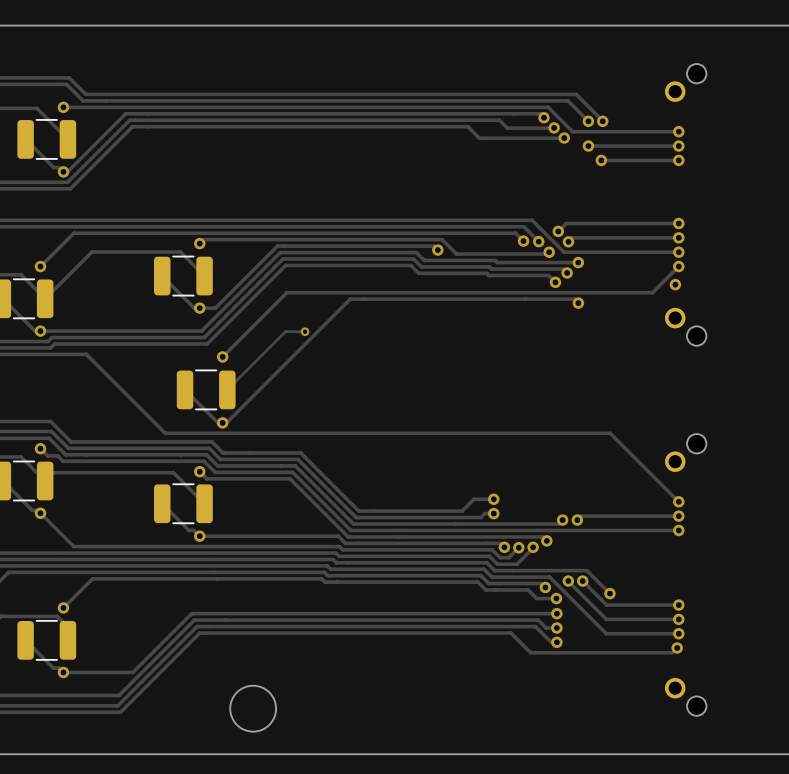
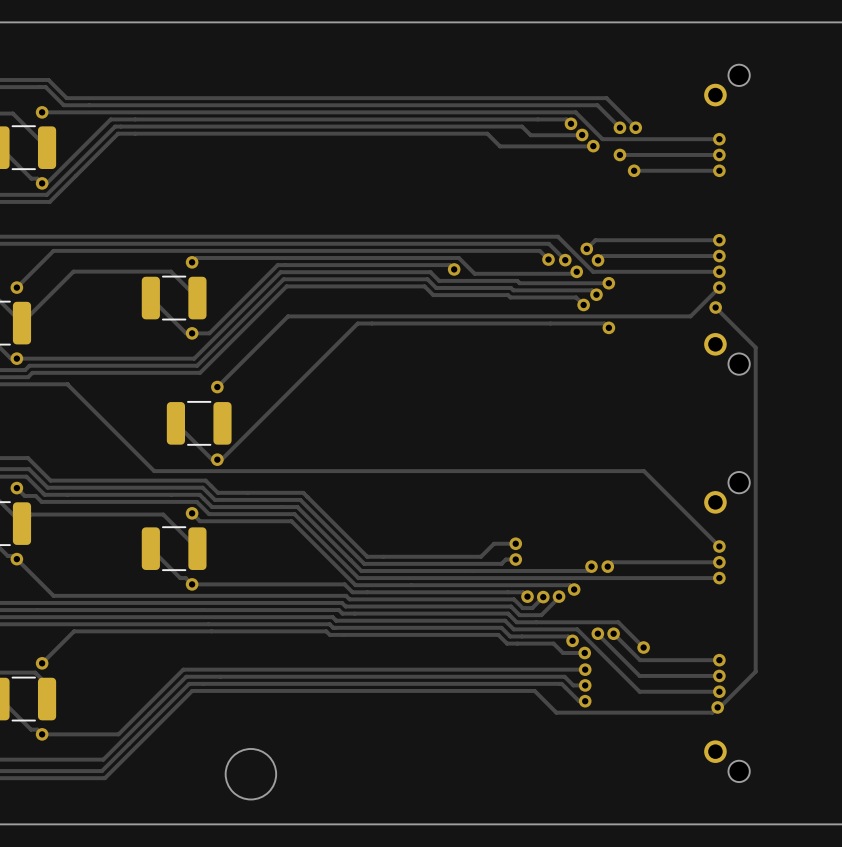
track: none -> (715, 307) (755, 347) (755, 671) (719, 707) (717, 707)
track: (305, 331) (285, 331) (227, 389) -> none
via: (305, 331) -> none

